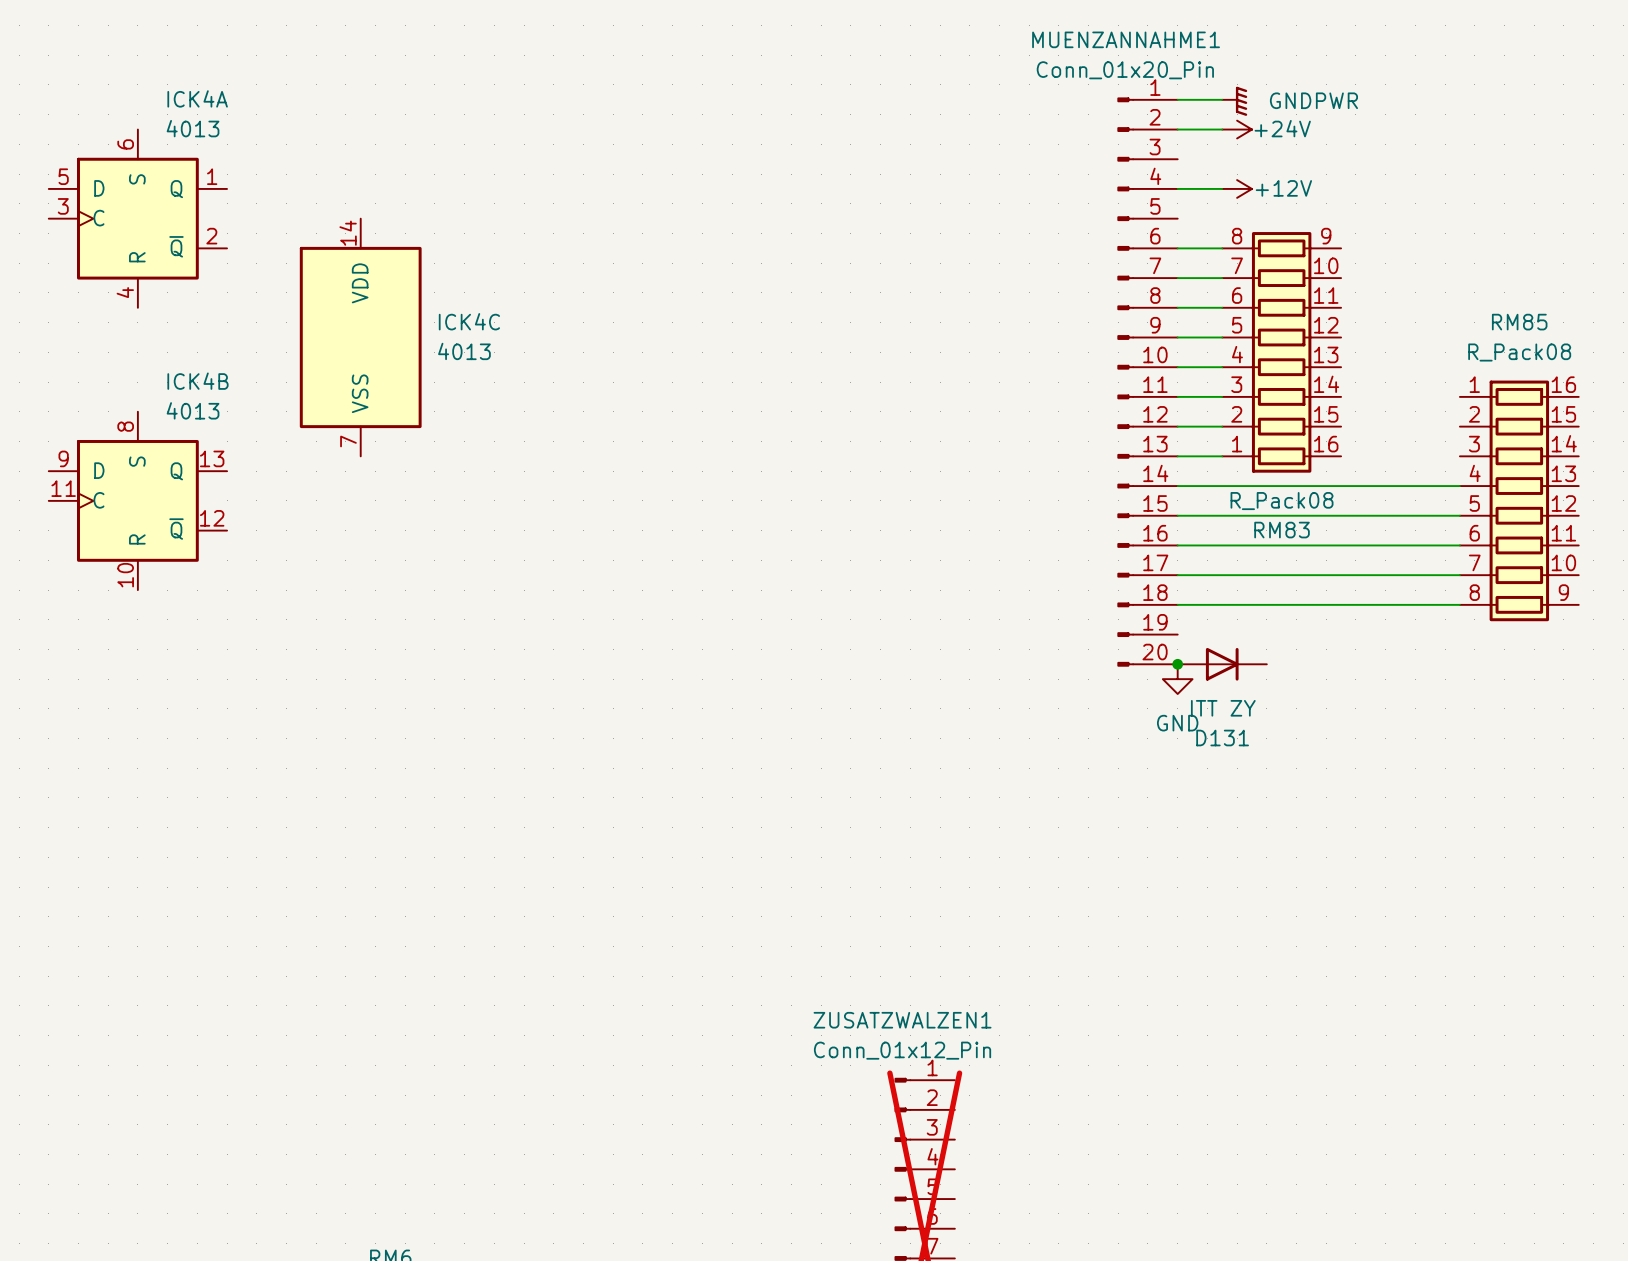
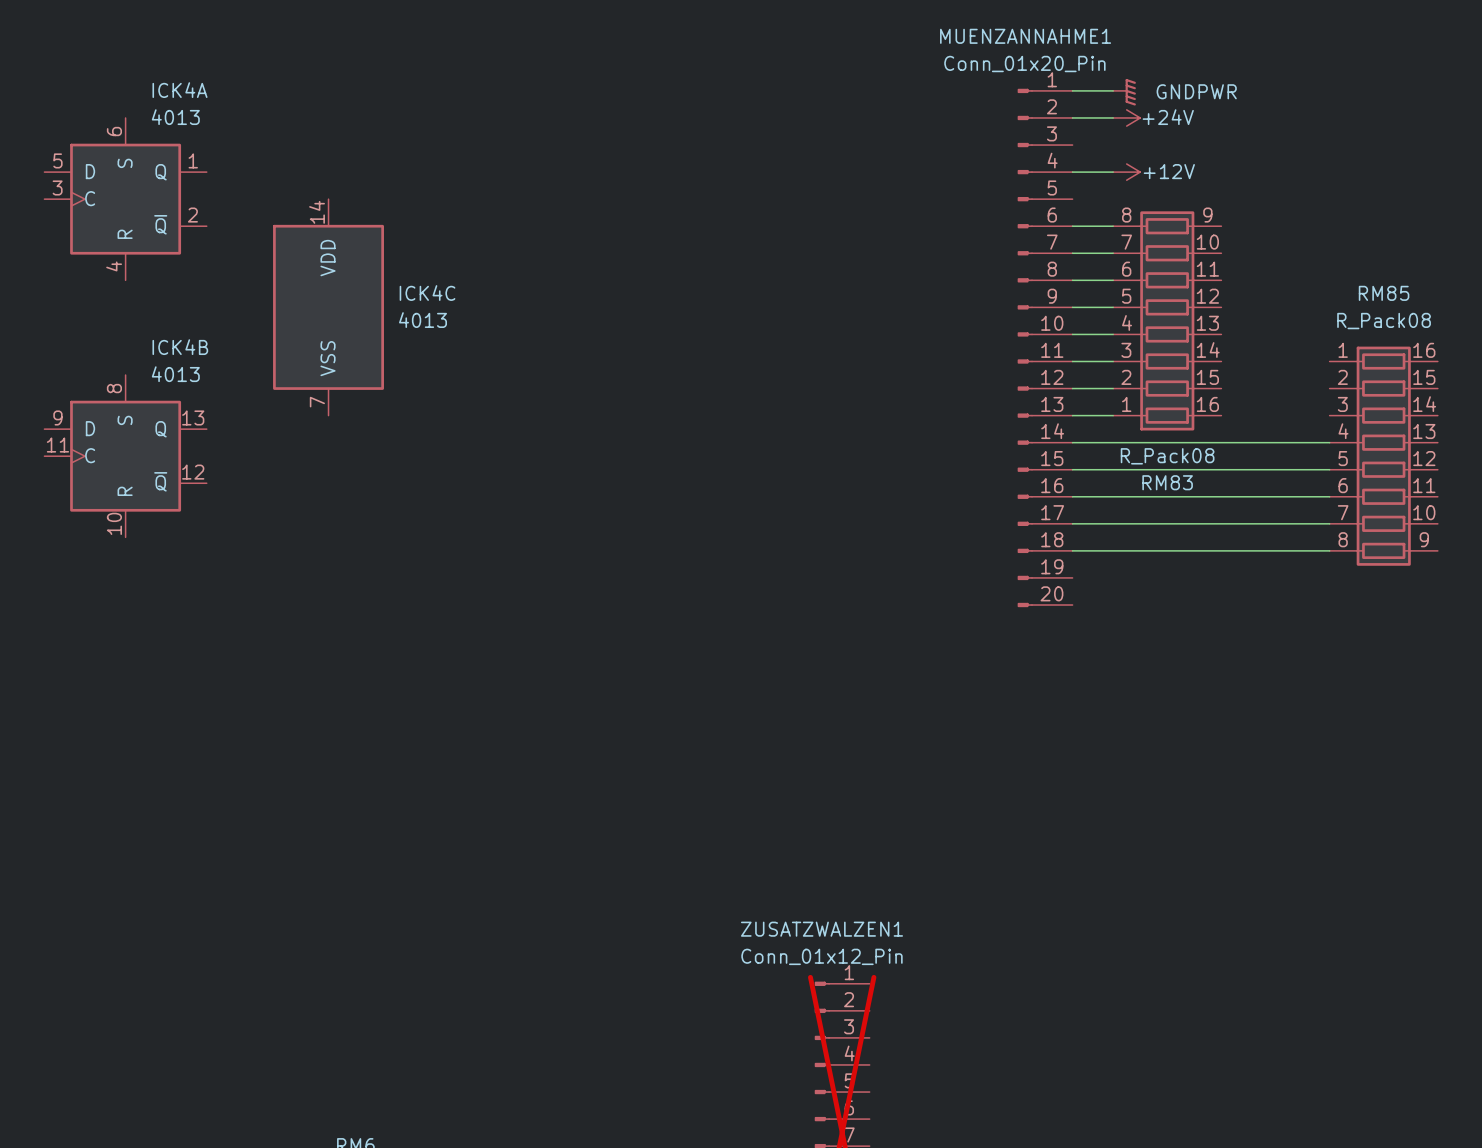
junction: (1177, 664) -> none
D131: ITT ZY (1222, 664) -> none
power symbol: GND (1177, 679) -> none

